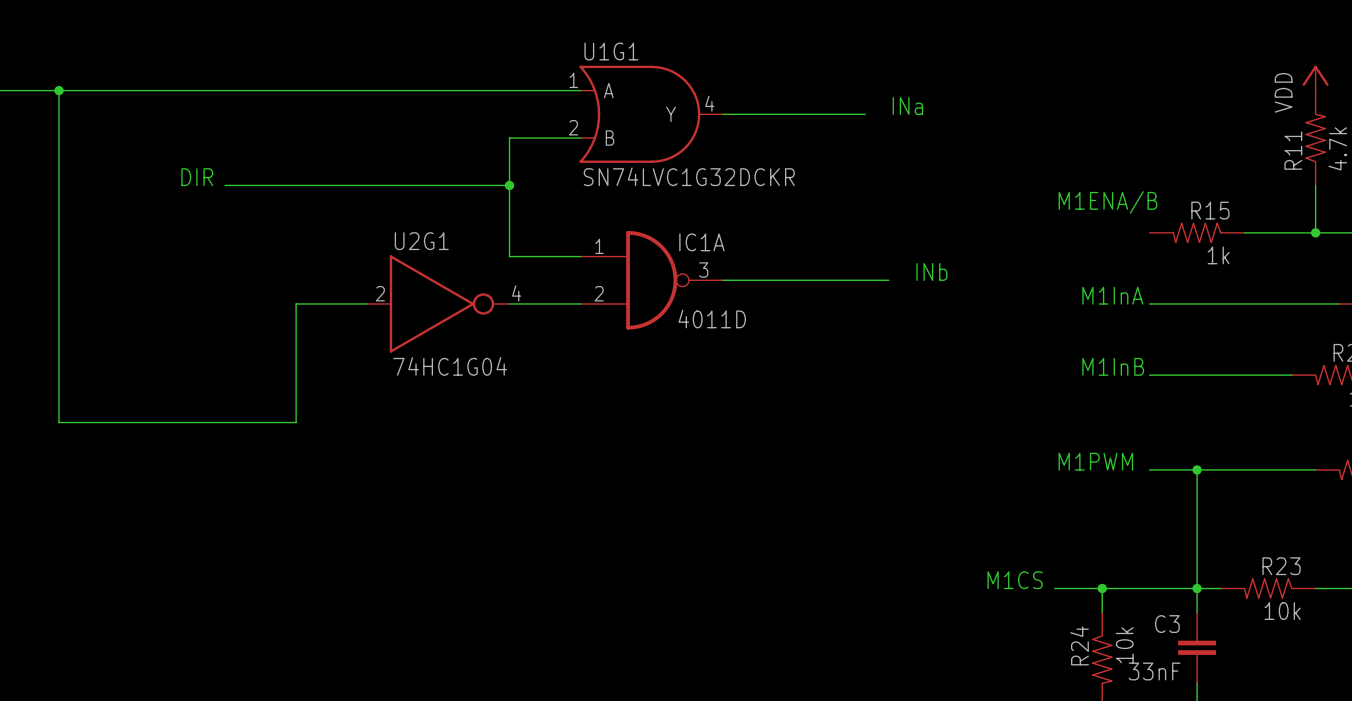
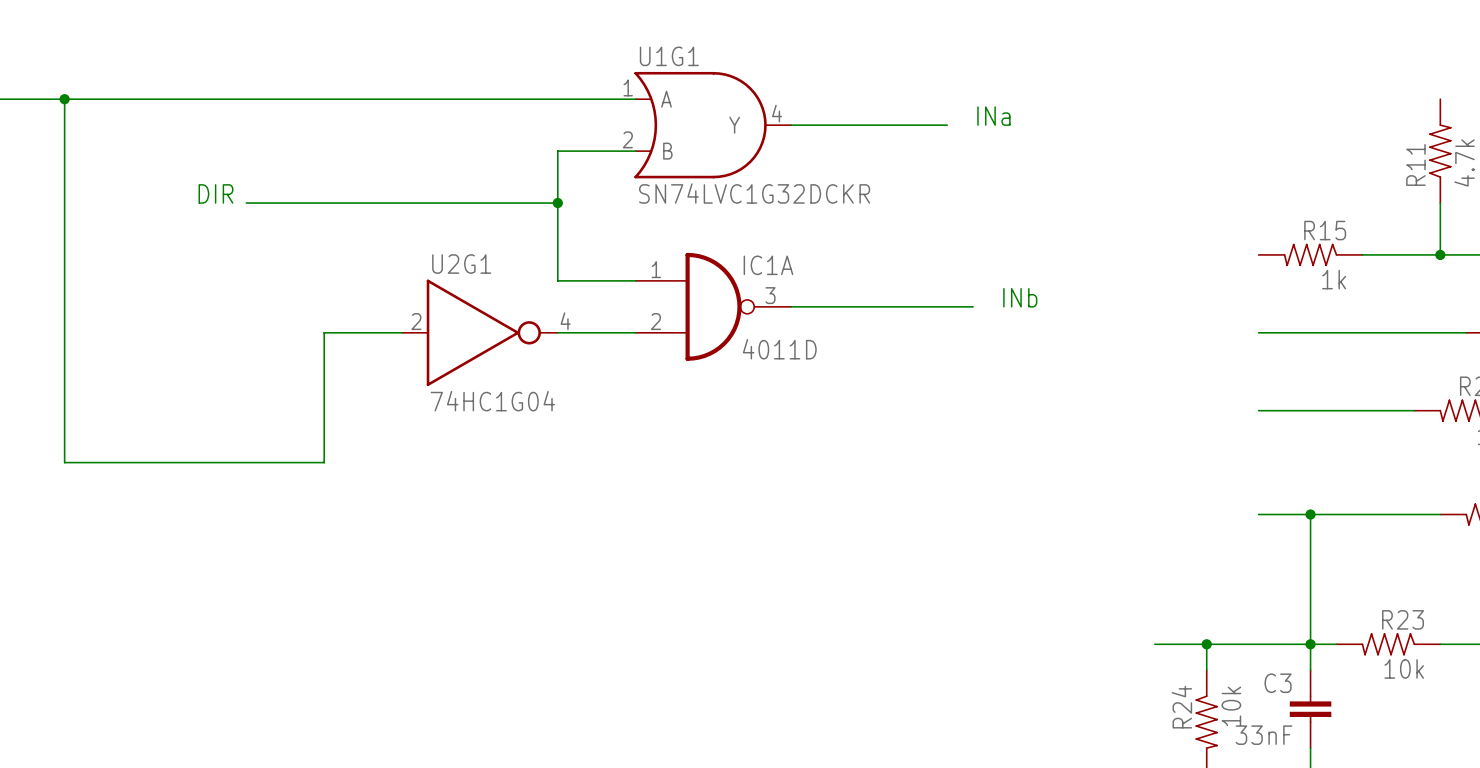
power symbol: VDD (1315, 78) -> none
text: M1ENA/B (1107, 202) -> none
text: M1InA (1112, 295) -> none
text: M1InB (1113, 366) -> none
text: M1PWM (1095, 461) -> none
text: M1CS (1015, 580) -> none

